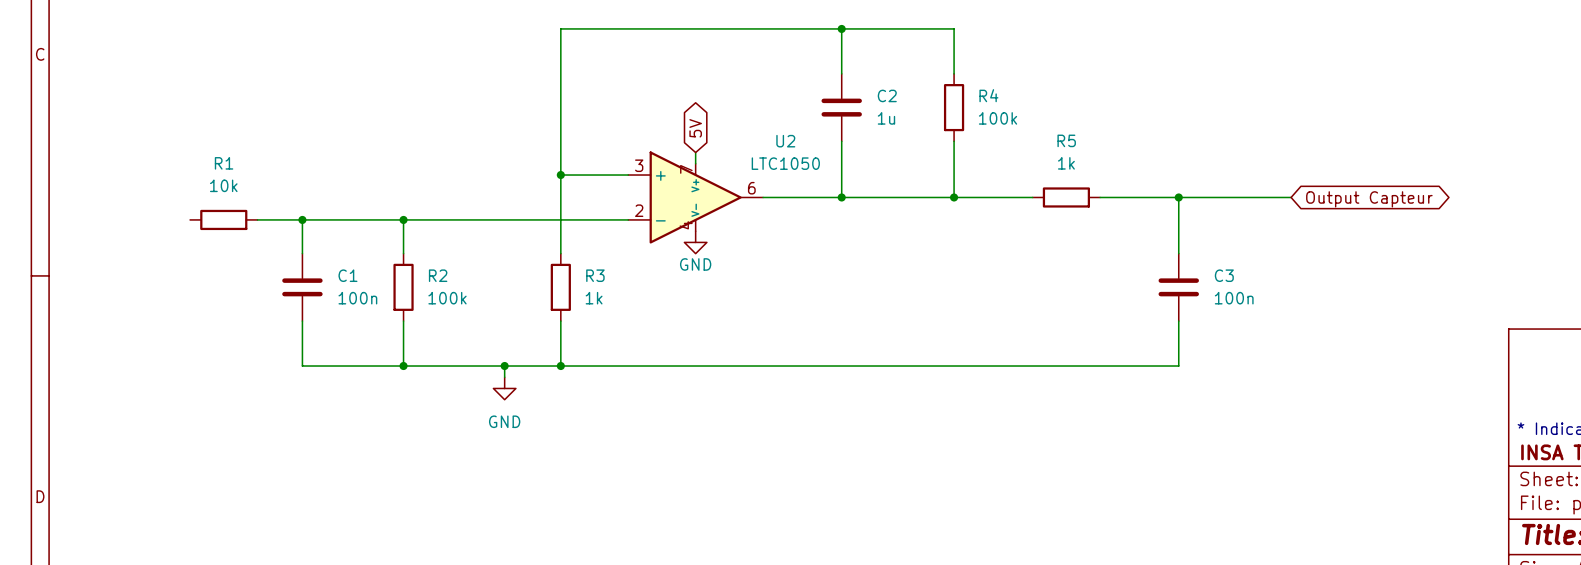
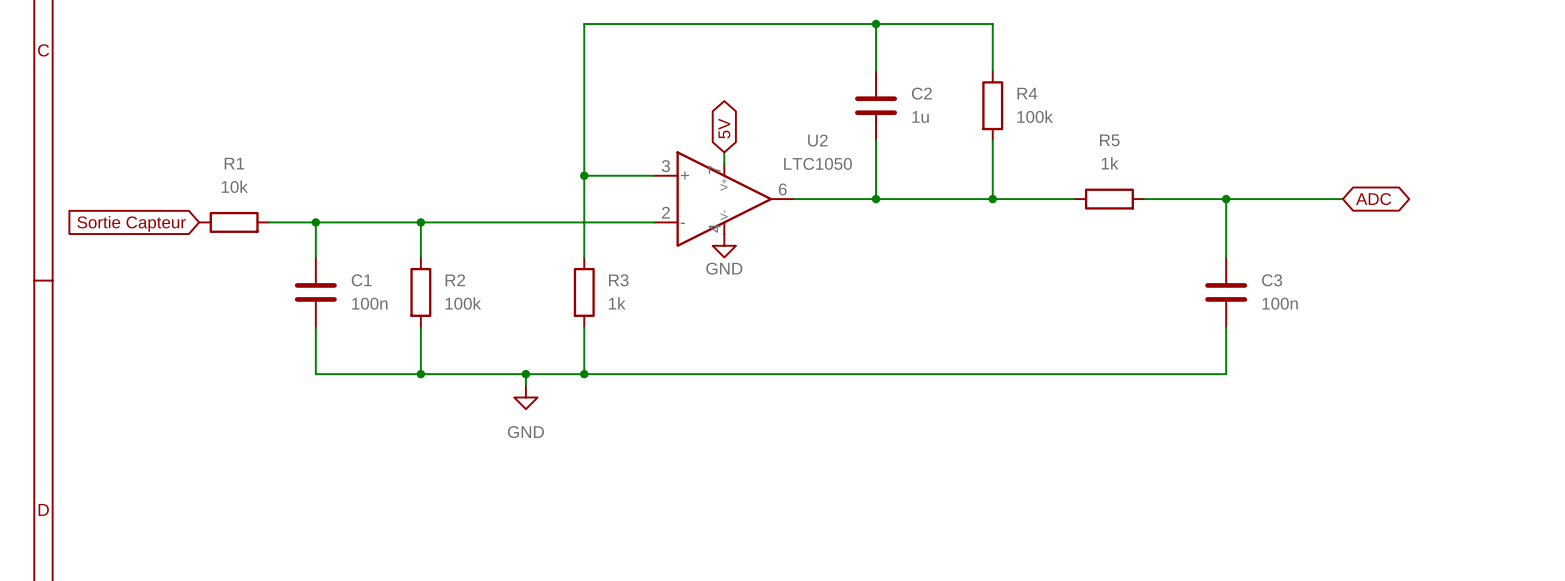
global label: Output Capteur (1369, 199) -> ADC (1373, 199)
global label: none -> Sortie Capteur (131, 223)

